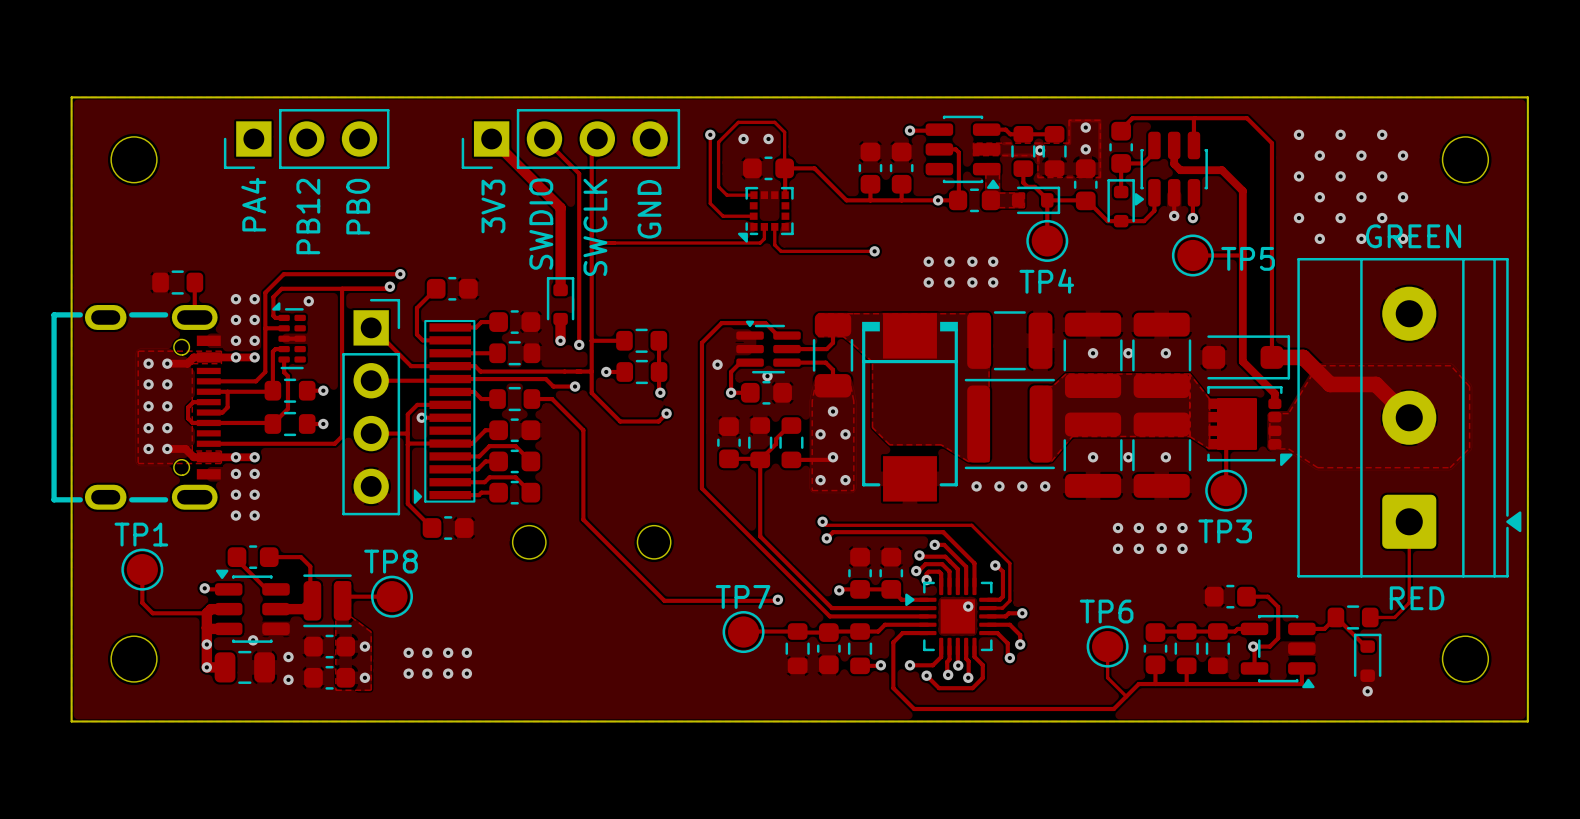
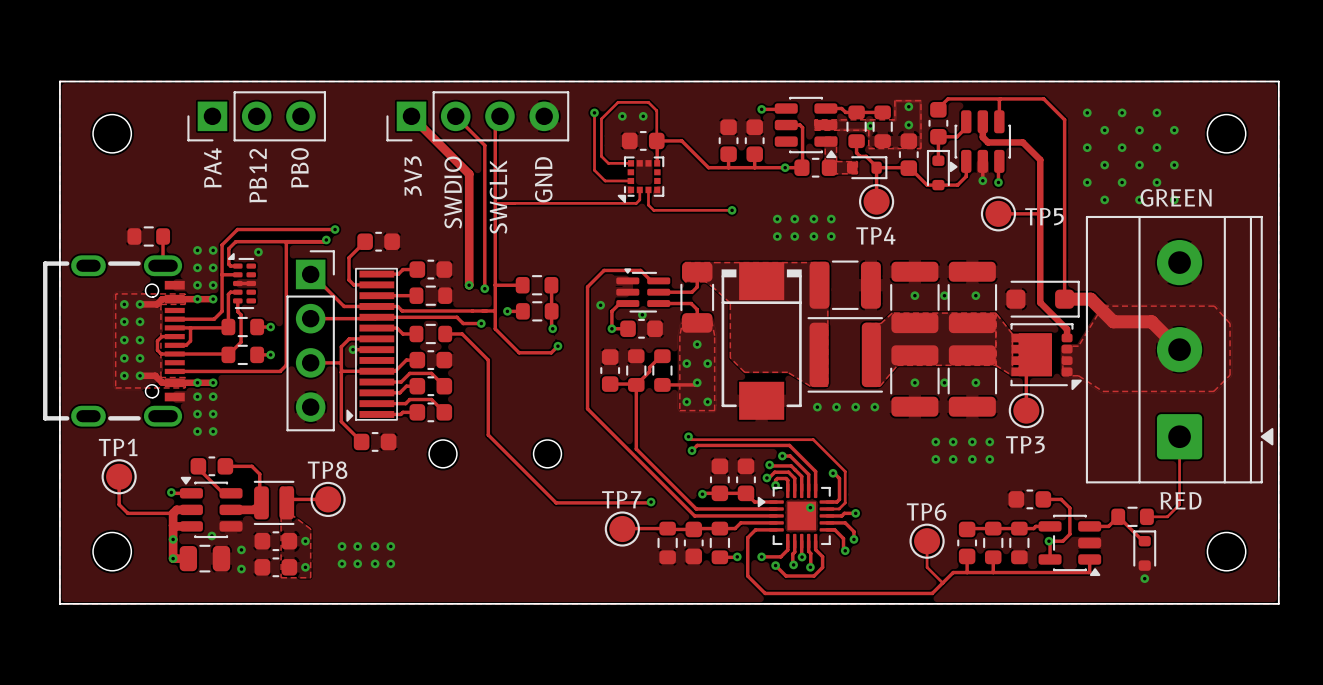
part: (560, 301) -> none

